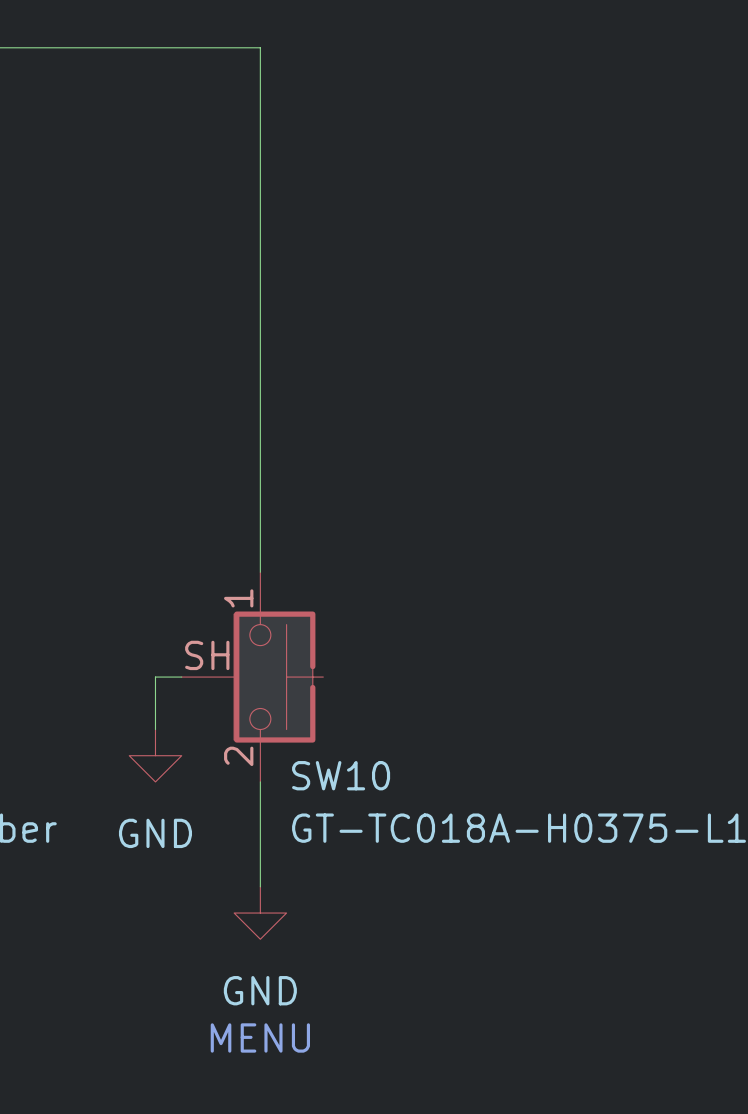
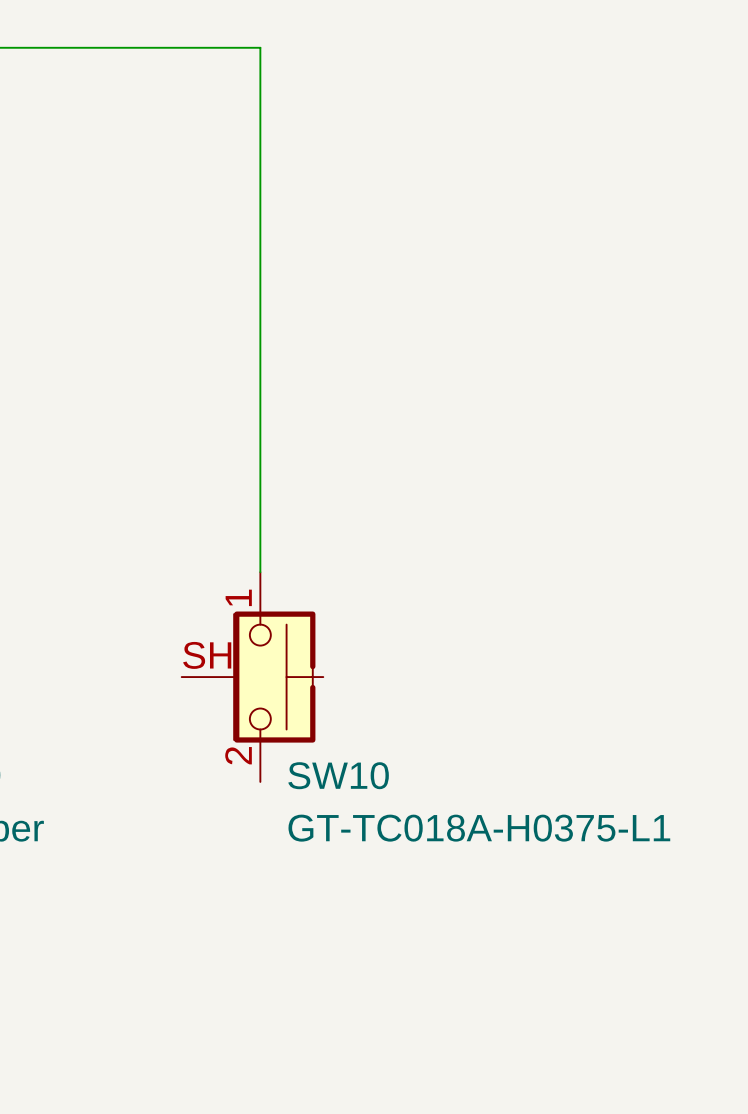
wire: (181, 677) (155, 677) (155, 729) -> none
power symbol: GND (155, 755) -> none
wire: (260, 781) (260, 886) -> none
power symbol: GND (260, 913) -> none
text: MENU (260, 1037) -> none

